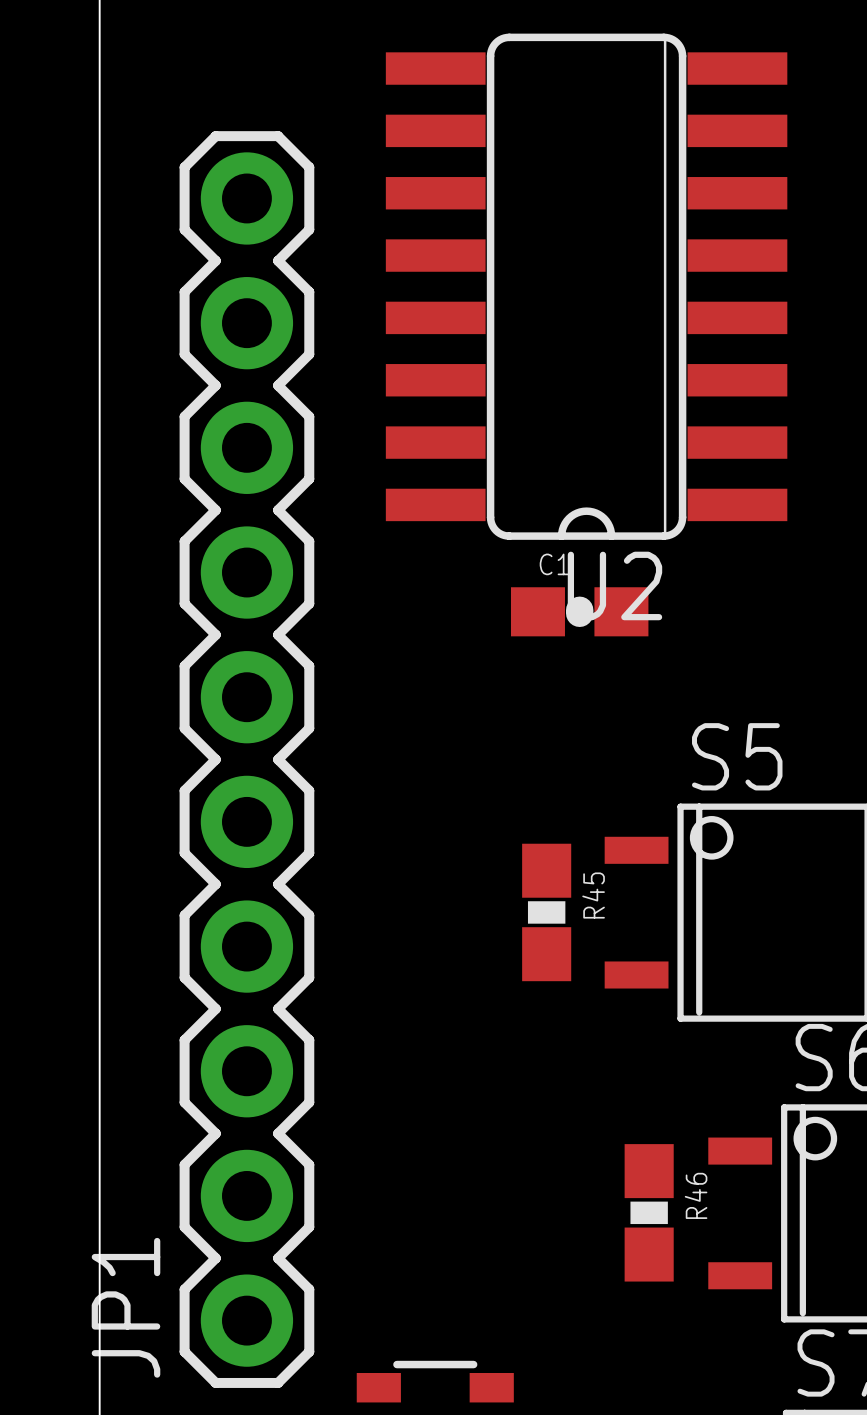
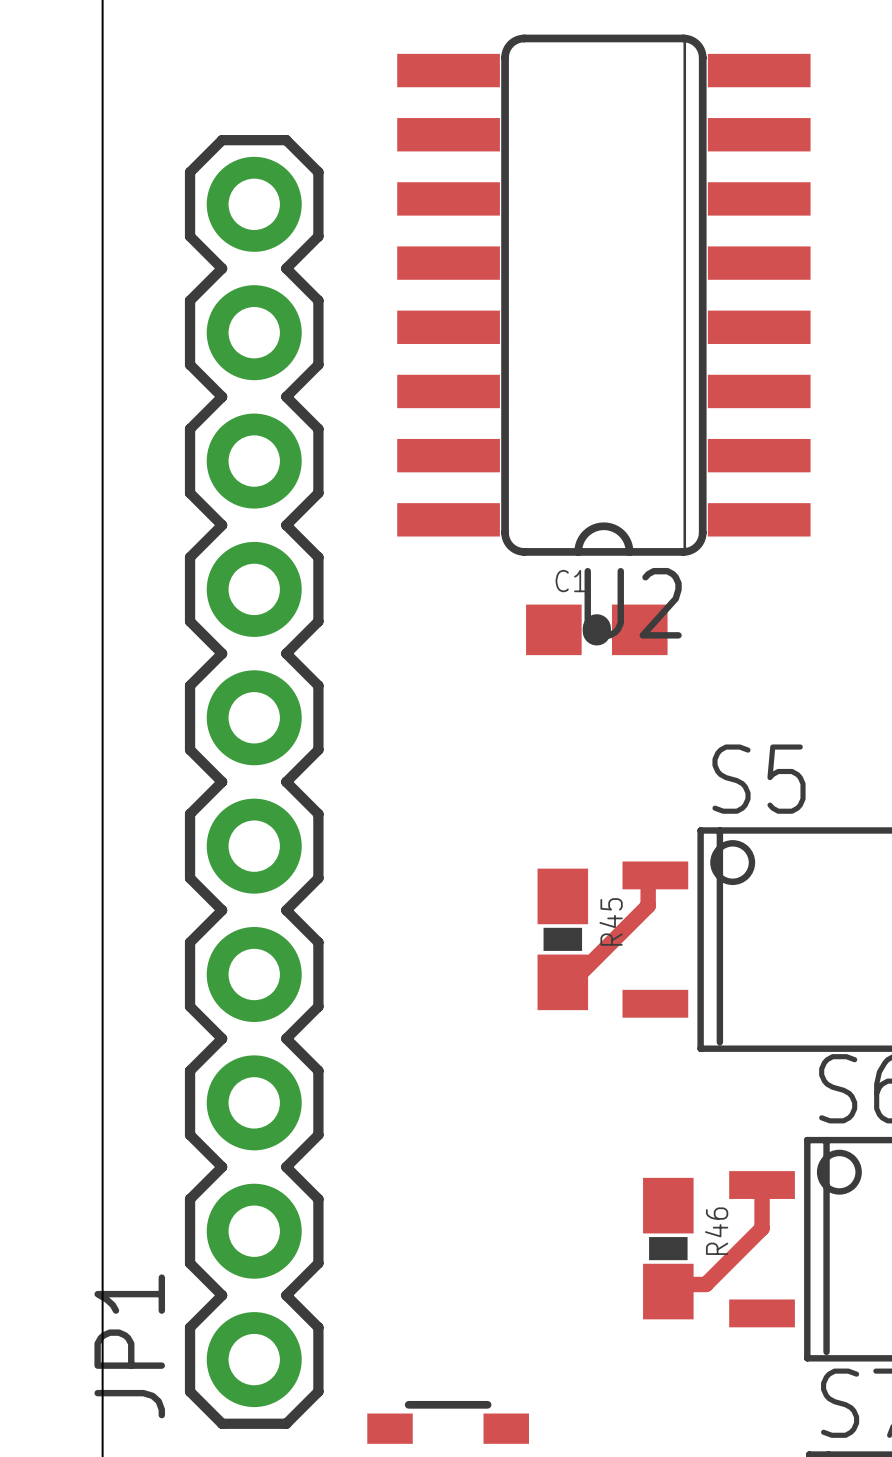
track: none -> (655, 875) (648, 882) (648, 905) (571, 982) (562, 982)
track: none -> (762, 1185) (762, 1228) (705, 1284) (675, 1284) (668, 1291)

